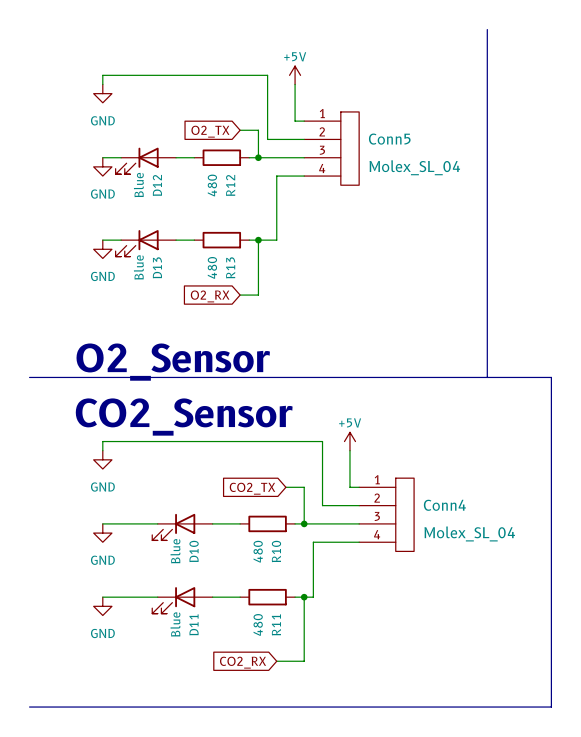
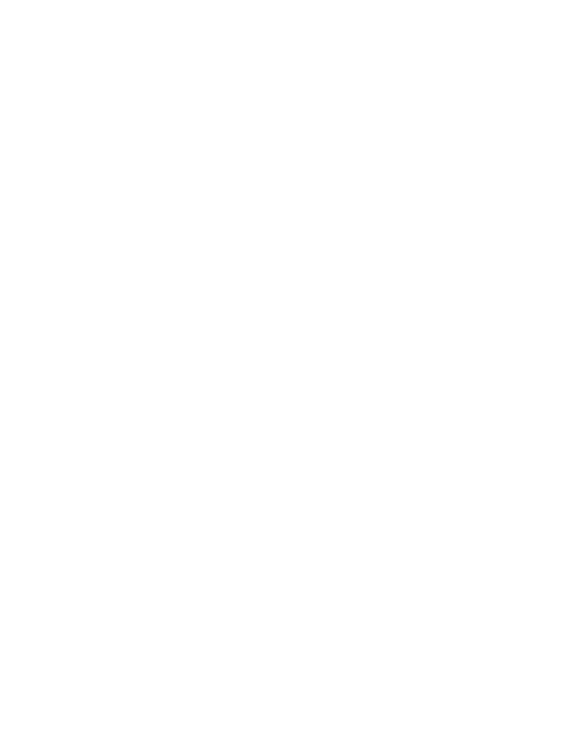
line: (487, 29) (487, 377) -> none
power symbol: +5V (295, 75) -> none
wire: (102, 84) (102, 75) (267, 75) (267, 139) (304, 139) -> none
wire: (295, 84) (295, 121) (304, 121) -> none
power symbol: GND (102, 93) -> none
wire: (240, 130) (258, 130) (258, 157) -> none
global label: O2_TX (210, 131) -> none
Conn5: Molex_SL_04 (331, 148) -> none
wire: (102, 157) (121, 157) -> none
wire: (176, 157) (194, 157) -> none
R12: 480 (221, 157) -> none
wire: (249, 157) (304, 157) -> none
junction: (258, 157) -> none
Blue: D12 (145, 160) -> none
power symbol: GND (102, 166) -> none
wire: (304, 176) (276, 176) (276, 240) (249, 240) -> none
wire: (102, 240) (121, 240) -> none
wire: (176, 240) (194, 240) -> none
R13: 480 (221, 240) -> none
wire: (258, 240) (258, 295) (240, 295) -> none
junction: (258, 240) -> none
Blue: D13 (145, 243) -> none
power symbol: GND (102, 249) -> none
global label: O2_RX (210, 296) -> none
text: O2_Sensor (173, 362) -> none
line: (29, 377) (551, 377) (551, 707) (29, 707) -> none
text: CO2_Sensor (184, 417) -> none
power symbol: +5V (349, 441) -> none
wire: (102, 450) (102, 441) (322, 441) (322, 505) (359, 505) -> none
wire: (349, 450) (349, 487) (359, 487) -> none
power symbol: GND (102, 459) -> none
wire: (285, 487) (304, 487) (304, 523) -> none
global label: CO2_TX (252, 488) -> none
Conn4: Molex_SL_04 (386, 514) -> none
wire: (102, 523) (157, 523) -> none
wire: (212, 523) (240, 523) -> none
R10: 480 (267, 523) -> none
wire: (295, 523) (359, 523) -> none
junction: (304, 523) -> none
Blue: D10 (182, 527) -> none
power symbol: GND (102, 533) -> none
wire: (359, 542) (313, 542) (313, 597) (295, 597) -> none
wire: (102, 597) (157, 597) -> none
wire: (212, 597) (240, 597) -> none
R11: 480 (267, 597) -> none
wire: (304, 597) (304, 661) (276, 661) -> none
junction: (304, 597) -> none
Blue: D11 (182, 600) -> none
power symbol: GND (102, 606) -> none
global label: CO2_RX (243, 662) -> none

